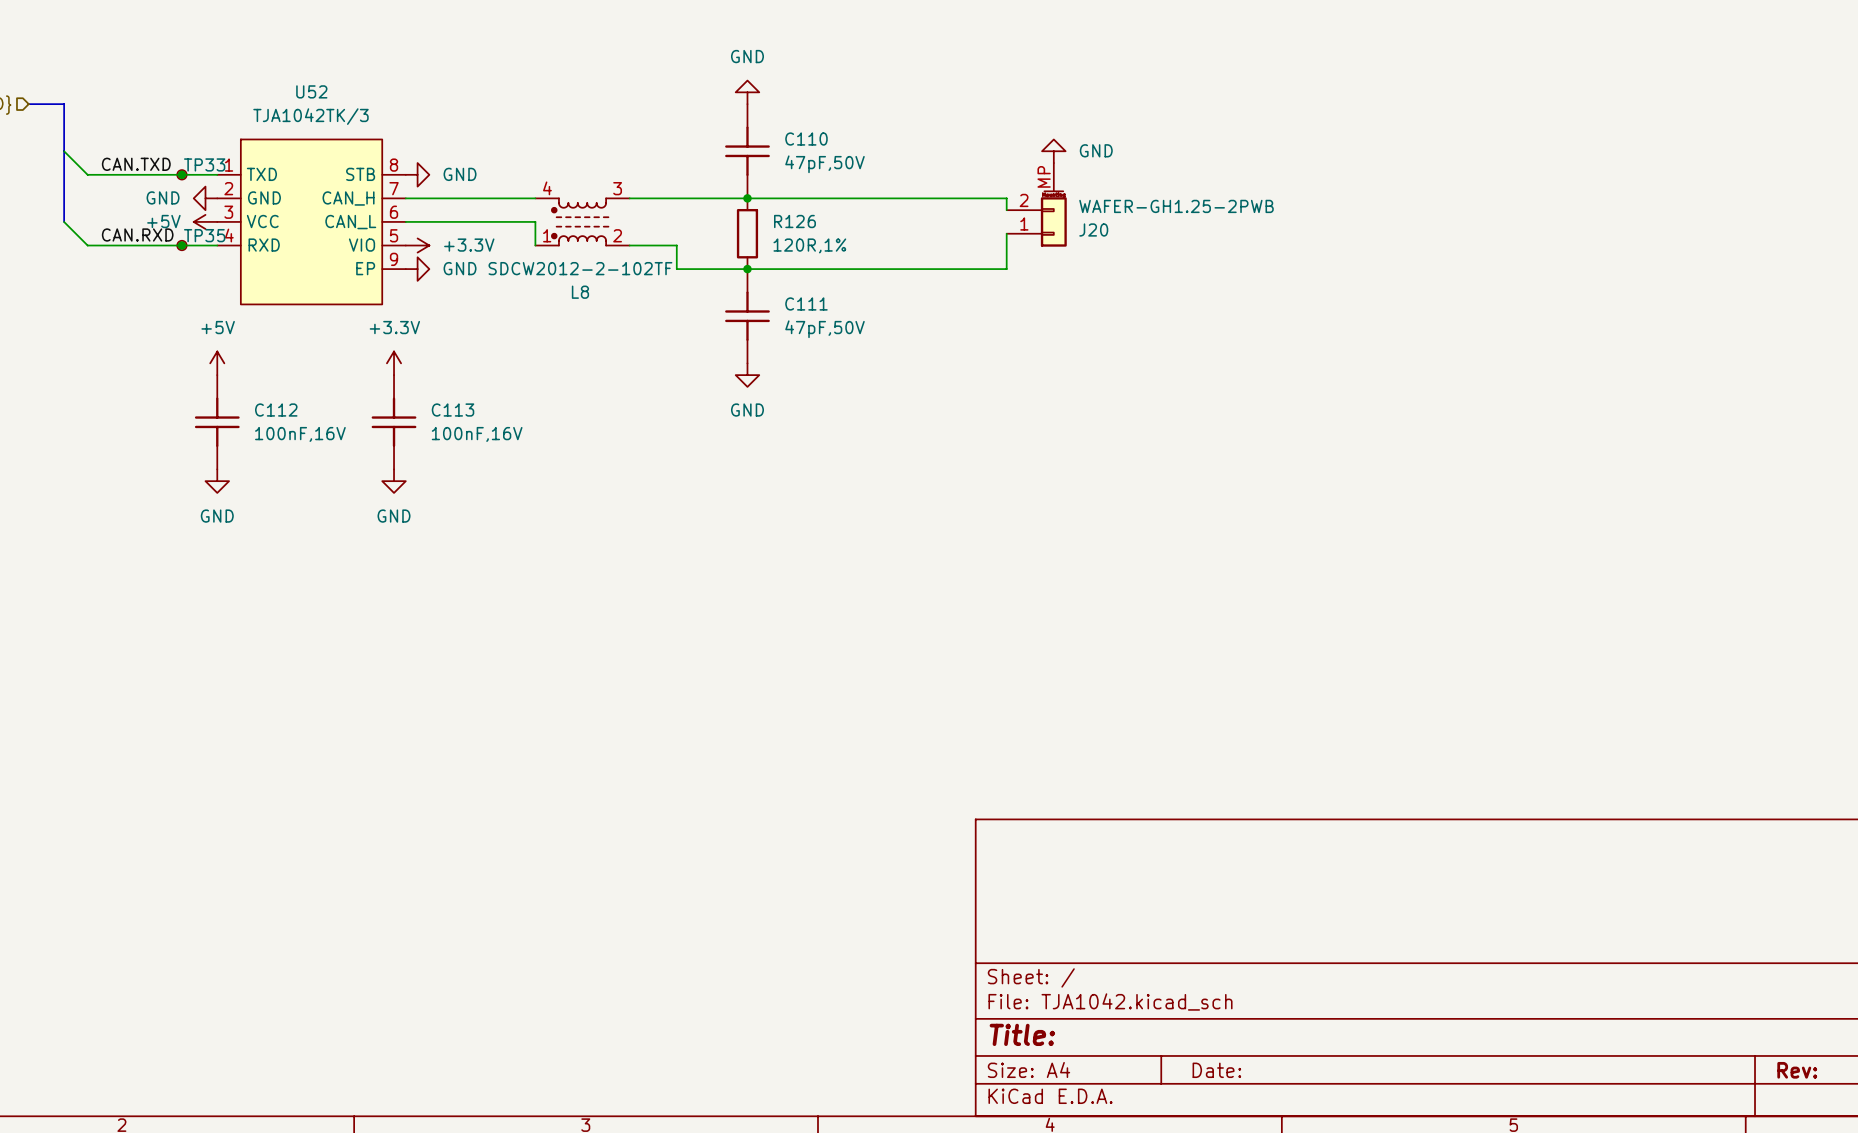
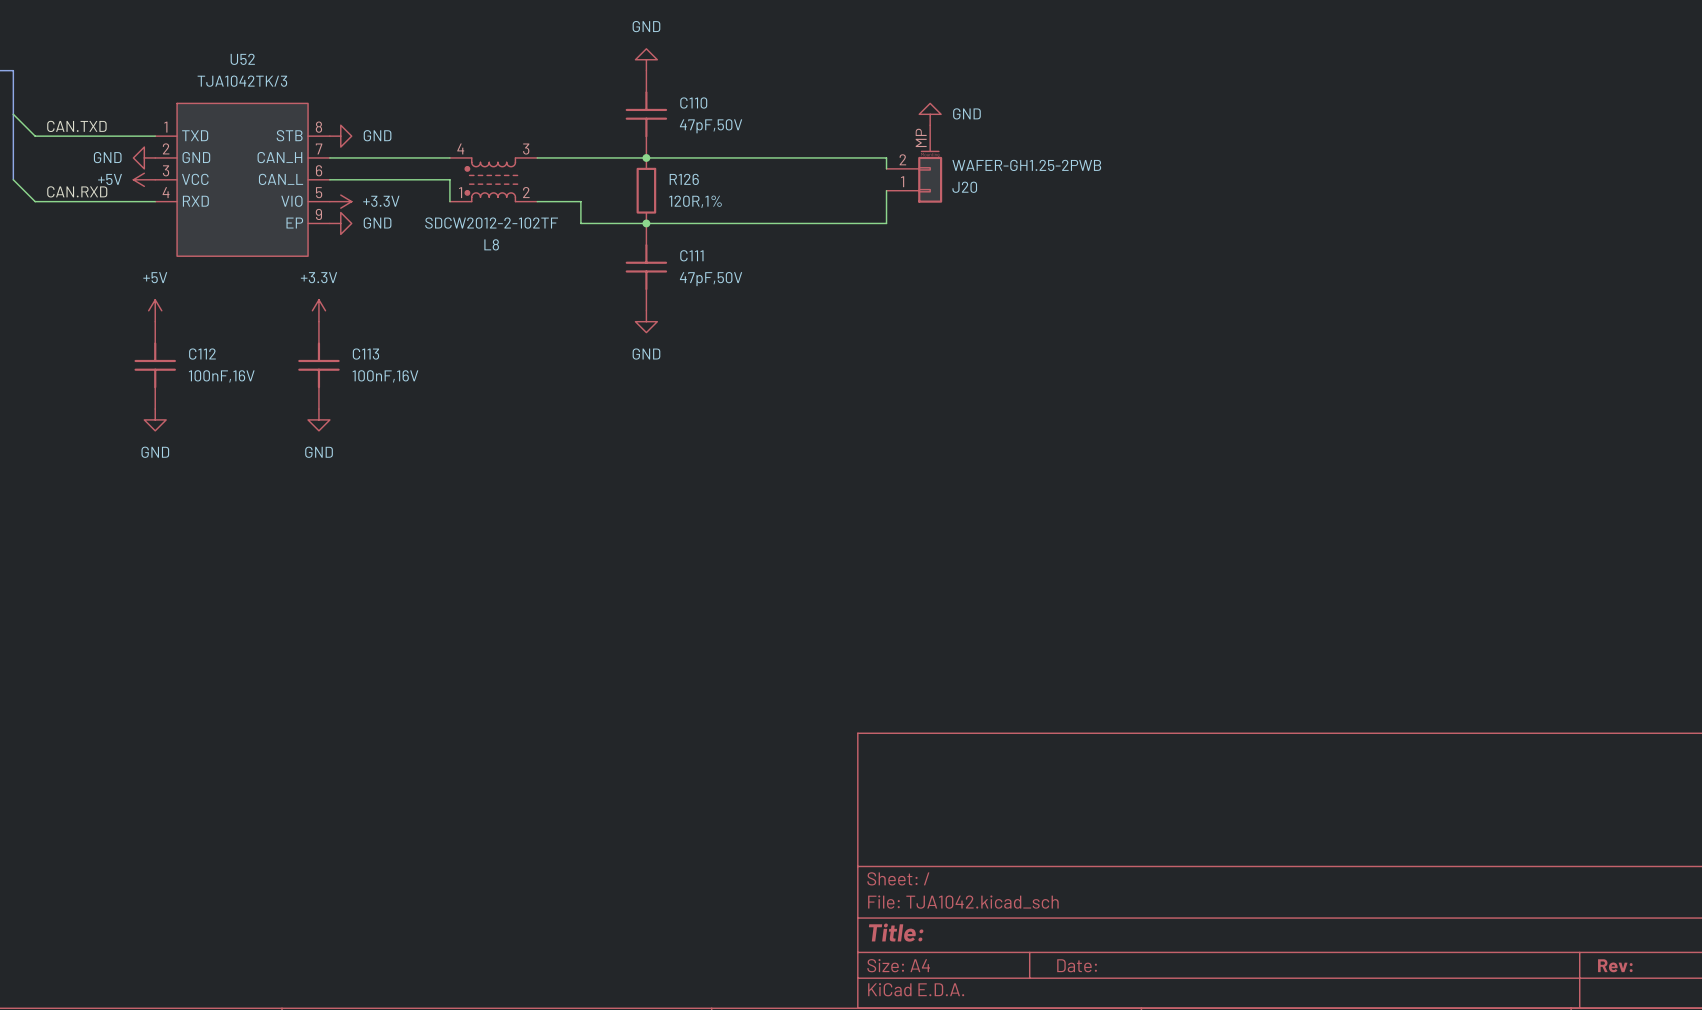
junction: (181, 174) -> none
TP33: (181, 174) -> none
junction: (181, 245) -> none
TP35: (181, 245) -> none

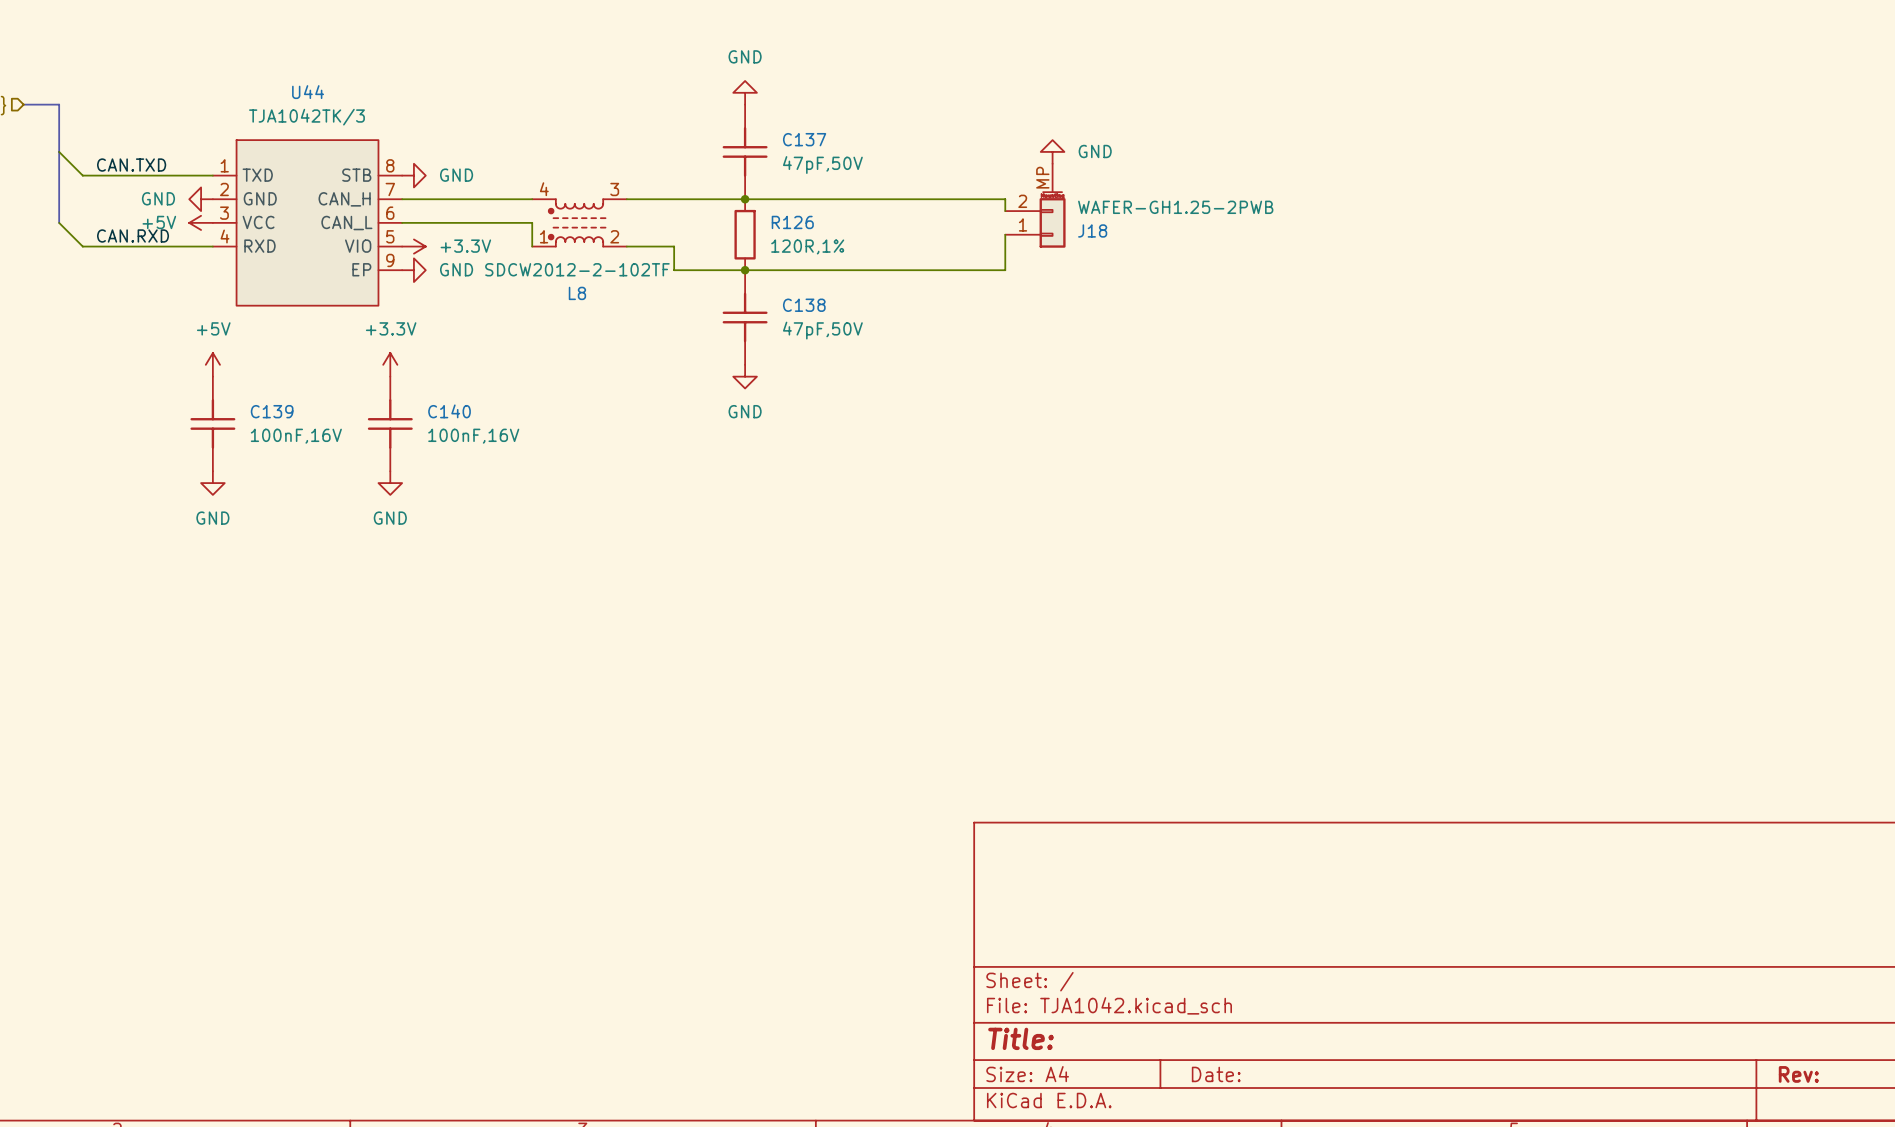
U52 name: U52 (242, 59) -> U44 (308, 92)
C110 name: C110 (693, 102) -> C137 (804, 139)
J20 name: J20 (964, 187) -> J18 (1092, 230)
C111 name: C111 (691, 255) -> C138 (804, 305)
C112 name: C112 (202, 354) -> C139 (272, 411)
C113 name: C113 (365, 354) -> C140 (449, 411)

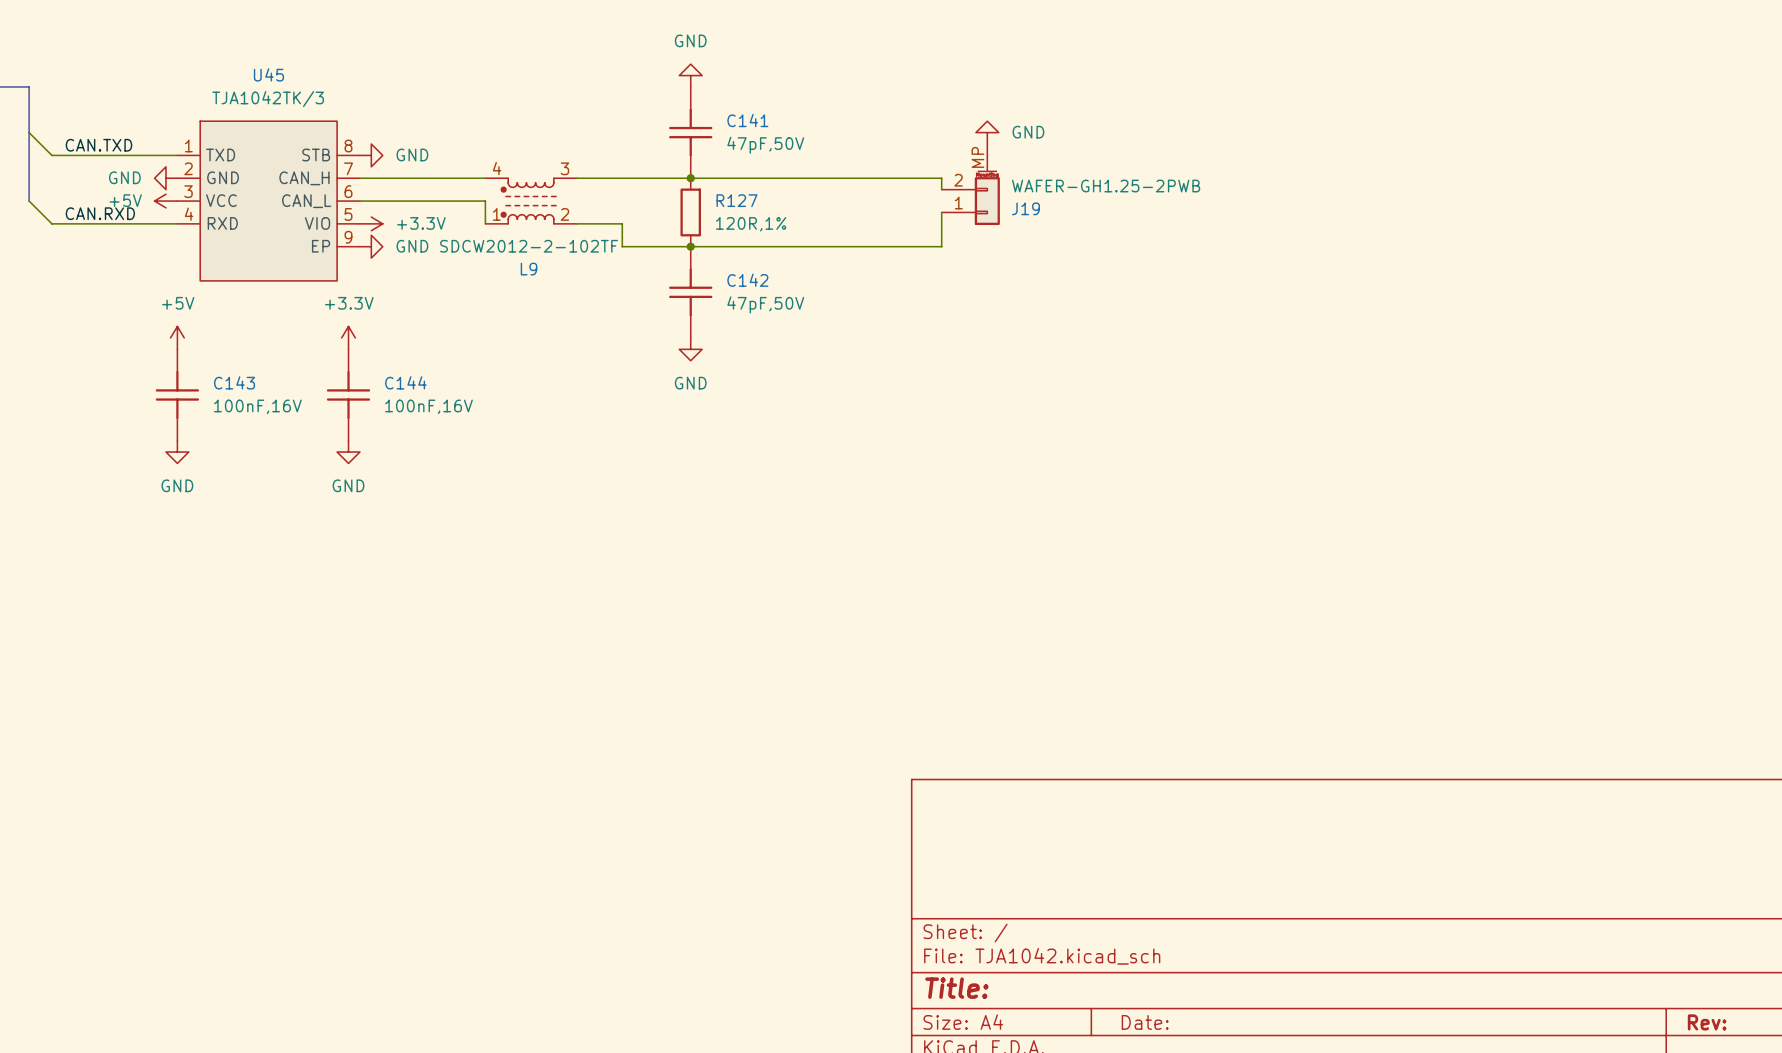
U44 name: U44 (308, 92) -> U45 (268, 74)
C137 name: C137 (804, 139) -> C141 (747, 120)
R126 name: R126 (792, 222) -> R127 (736, 200)
J18 name: J18 (1092, 230) -> J19 (1025, 208)
L8 name: L8 (577, 293) -> L9 (529, 269)
C138 name: C138 (804, 305) -> C142 (747, 280)
C139 name: C139 (272, 411) -> C143 (234, 382)
C140 name: C140 (449, 411) -> C144 (405, 382)

